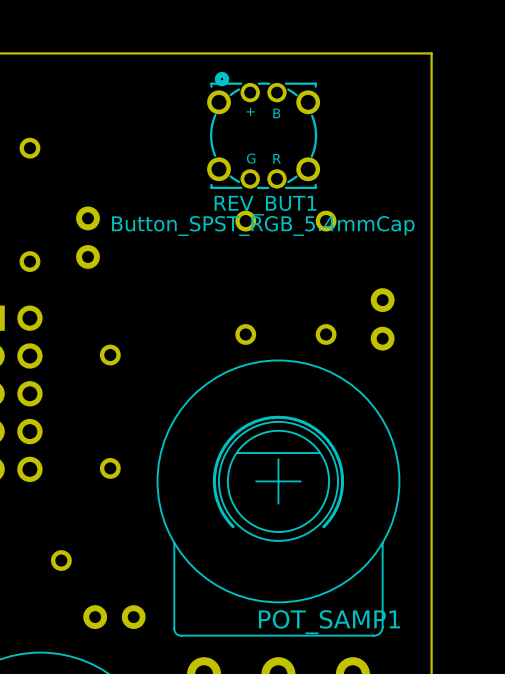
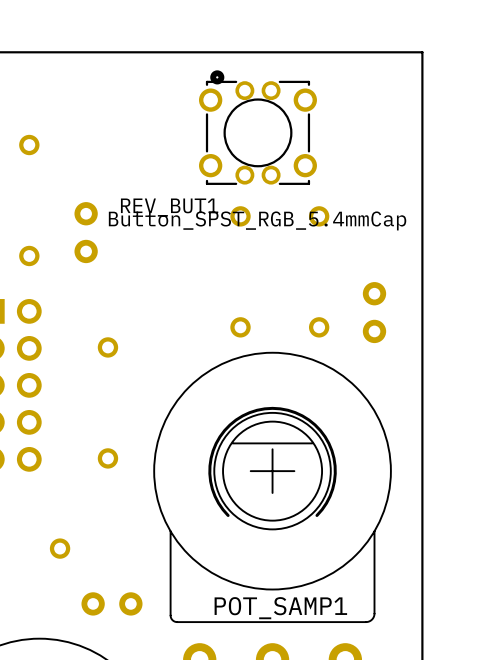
REV_BUT1 footprint: [207, 71, 321, 190] -> [198, 70, 317, 185]
REV_BUT1 name position: REV_BUT1 (265, 205) -> REV_BUT1 (169, 207)
POT_SAMP1 name position: POT_SAMP1 (329, 622) -> POT_SAMP1 (280, 608)

